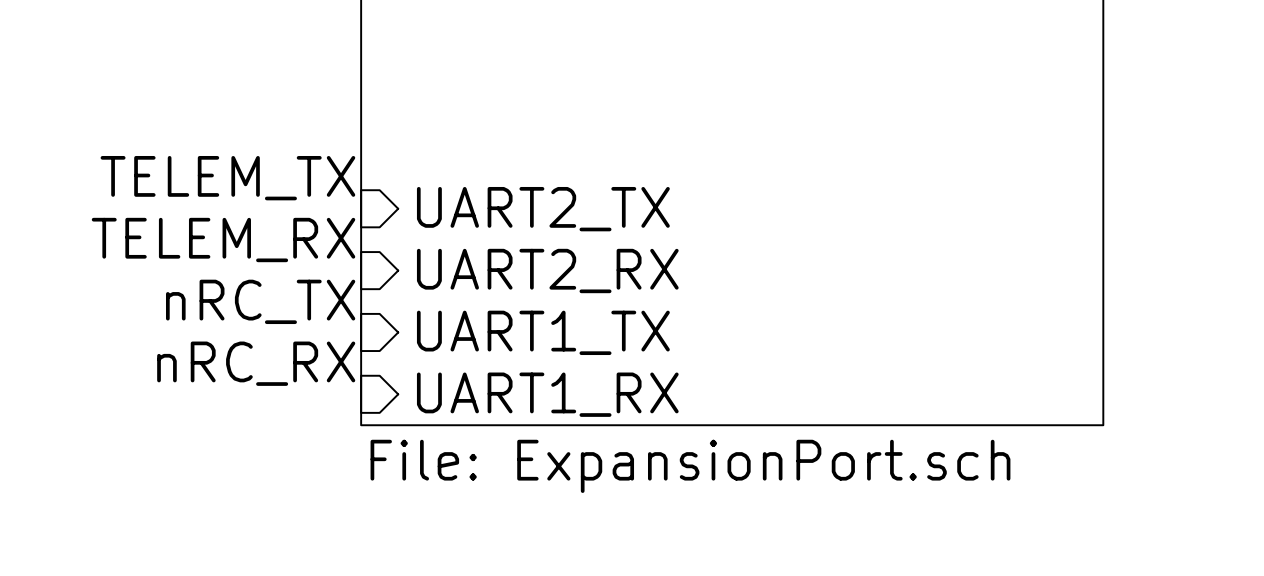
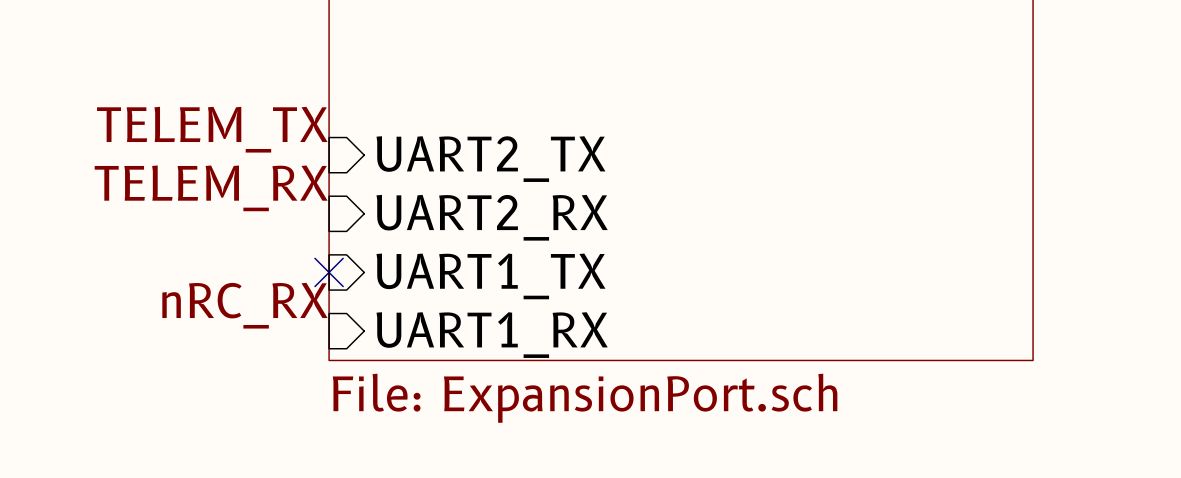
label: nRC_TX (260, 301) -> none
no-connect mark: none -> (329, 272)

